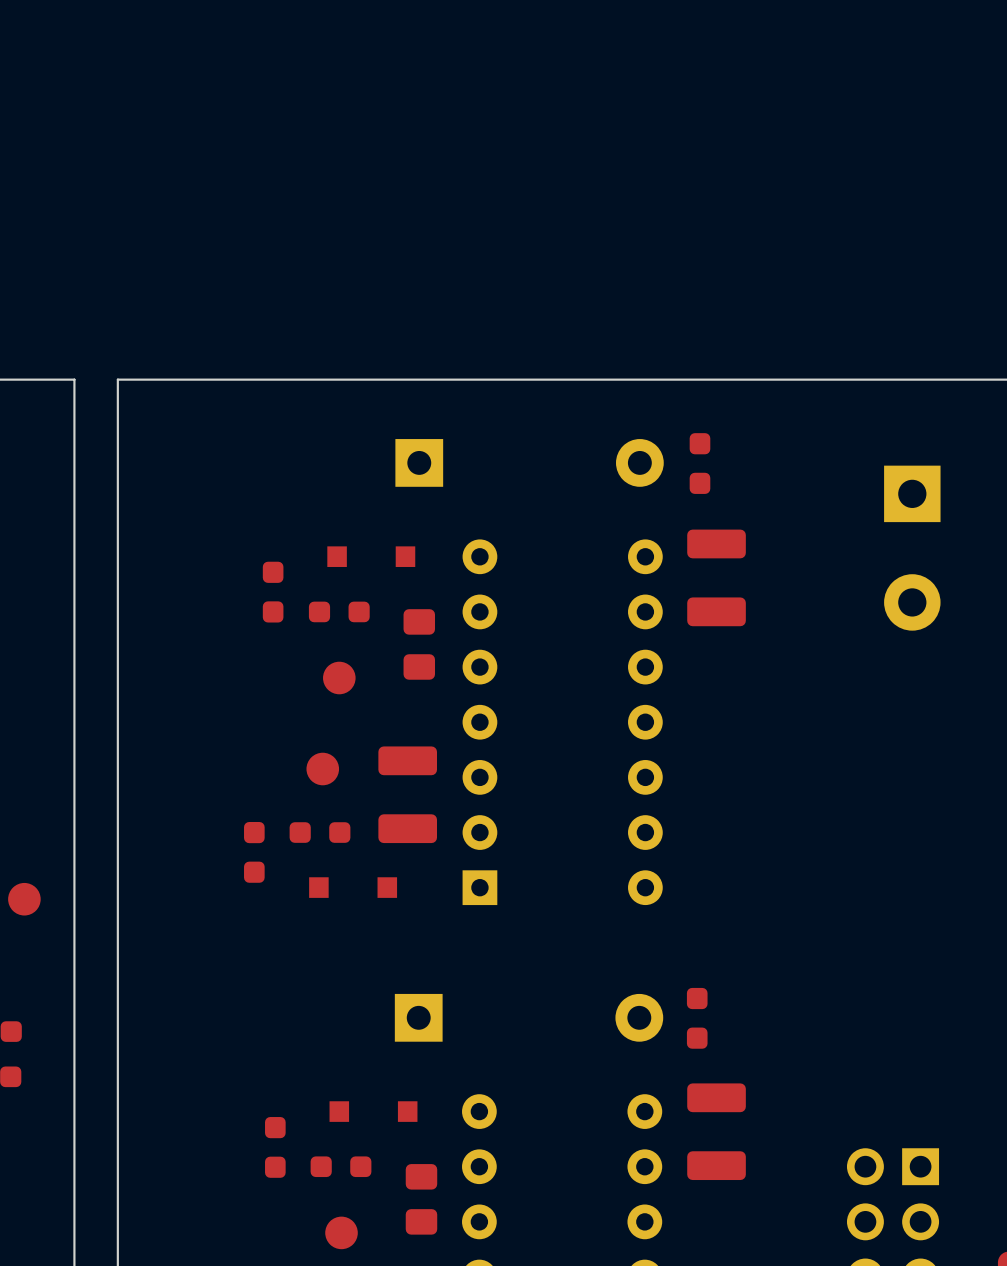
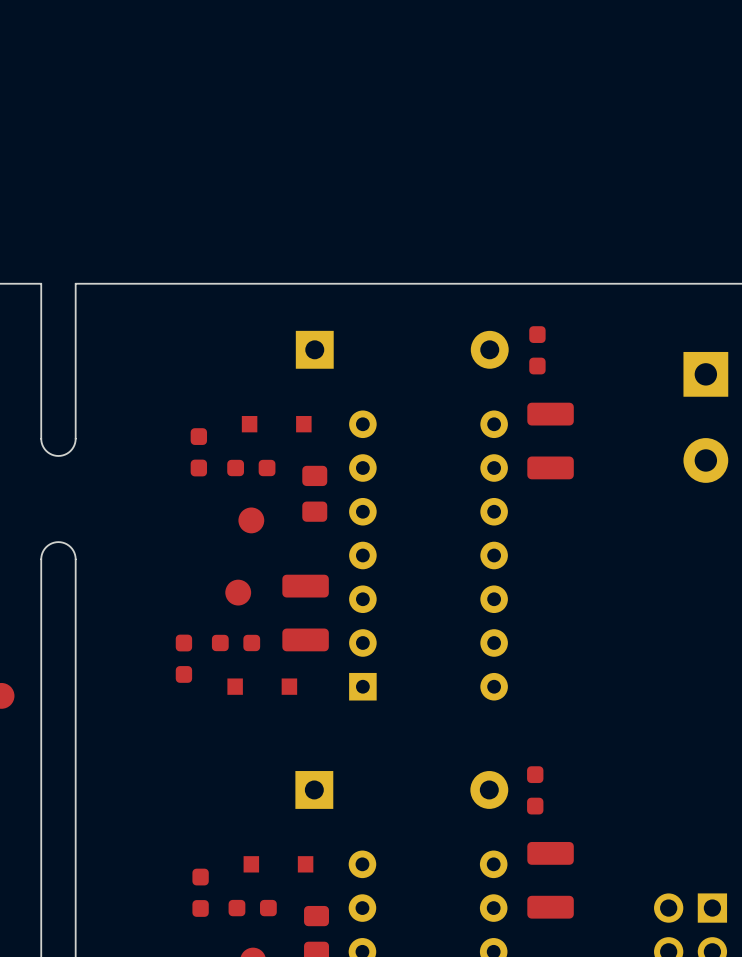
board edge: (74, 575) (74, 727) -> (75, 559) (70, 547) (58, 542) (46, 547) (41, 559)
board edge: (117, 575) (117, 727) -> (75, 438) (70, 450) (58, 455) (46, 450) (41, 438)

